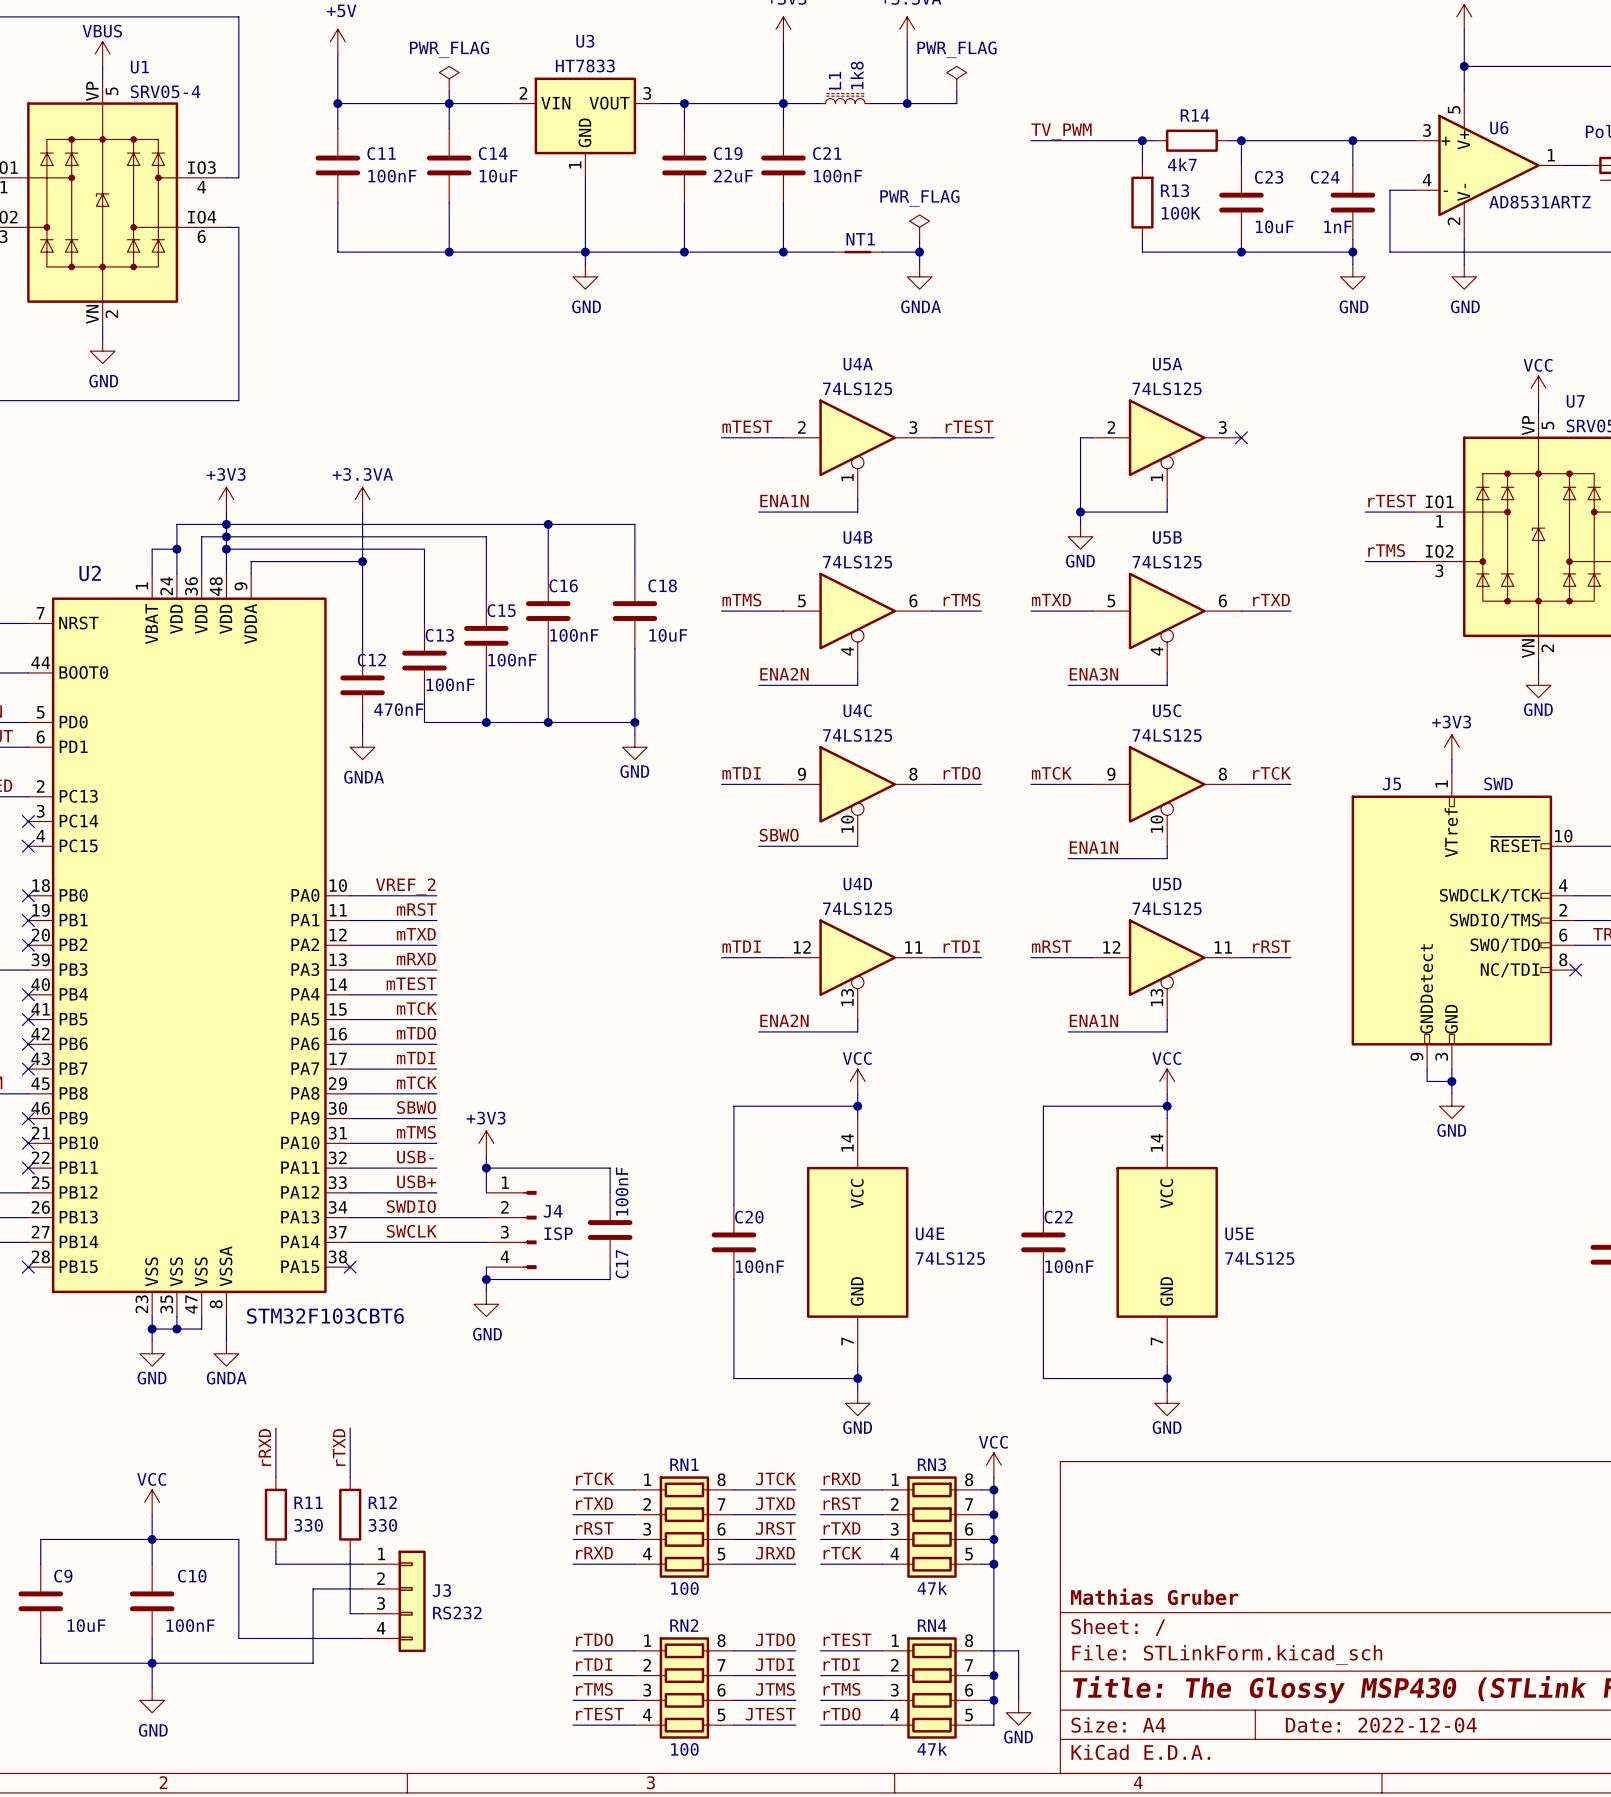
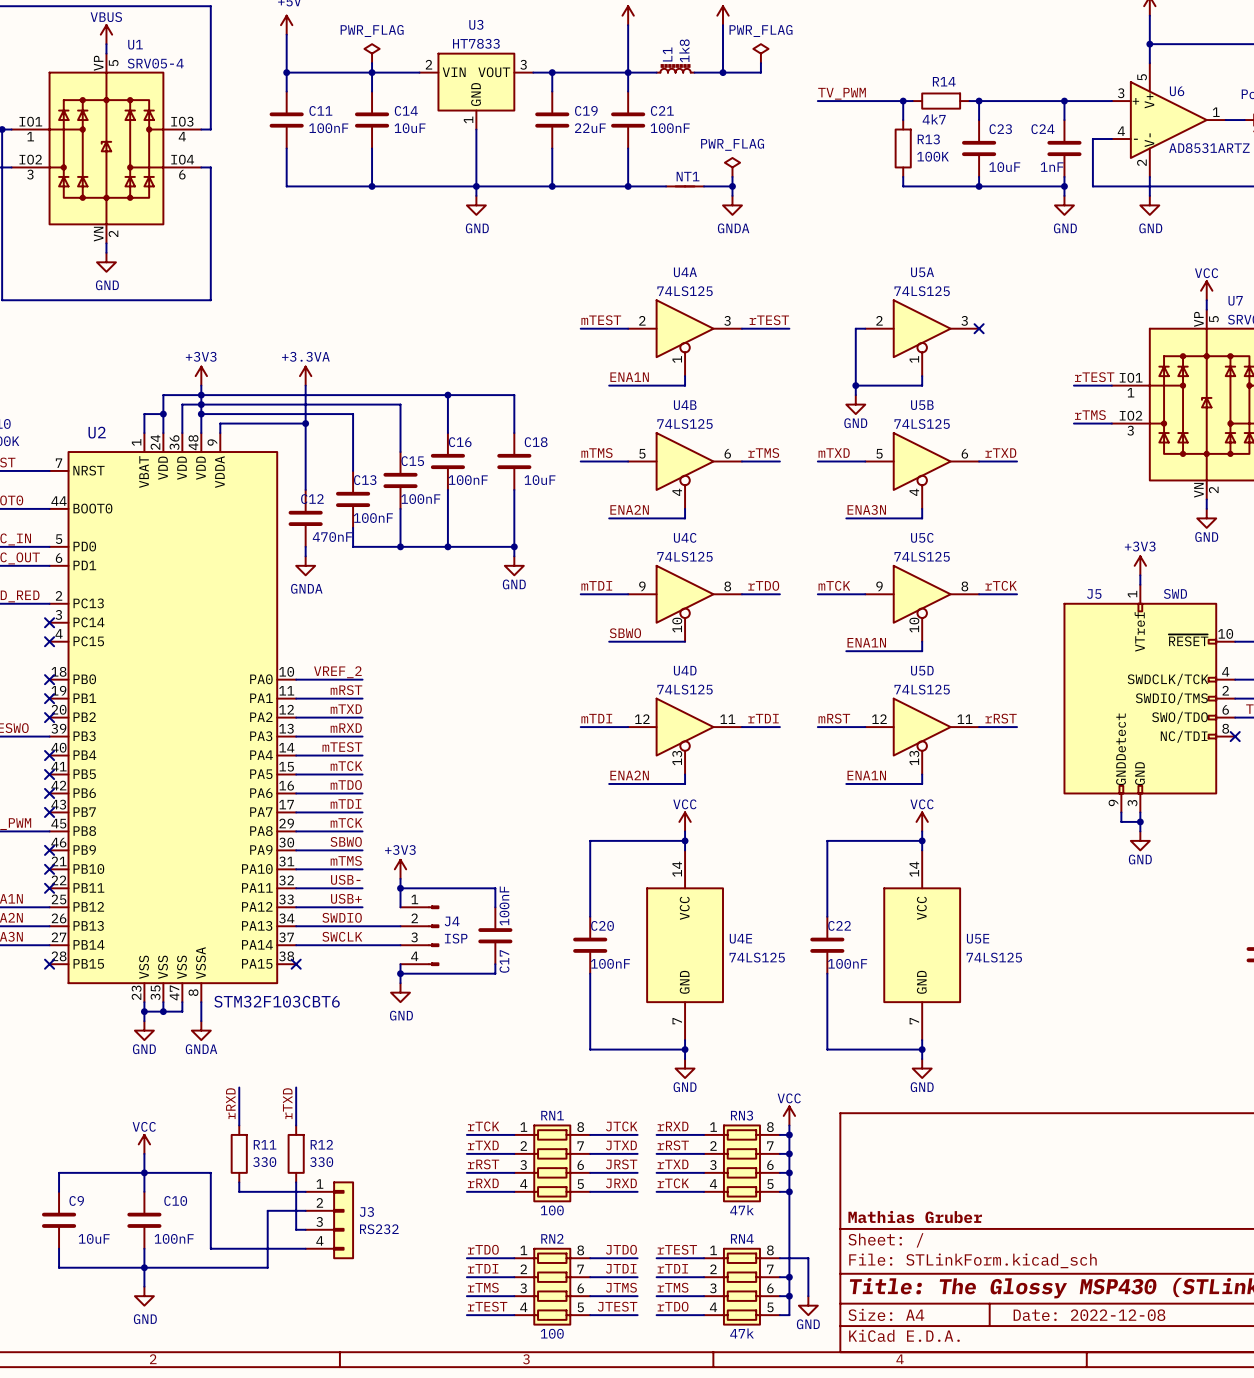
title block: Date: 2022-12-04 (1381, 1725) -> Date: 2022-12-08 (1089, 1315)

